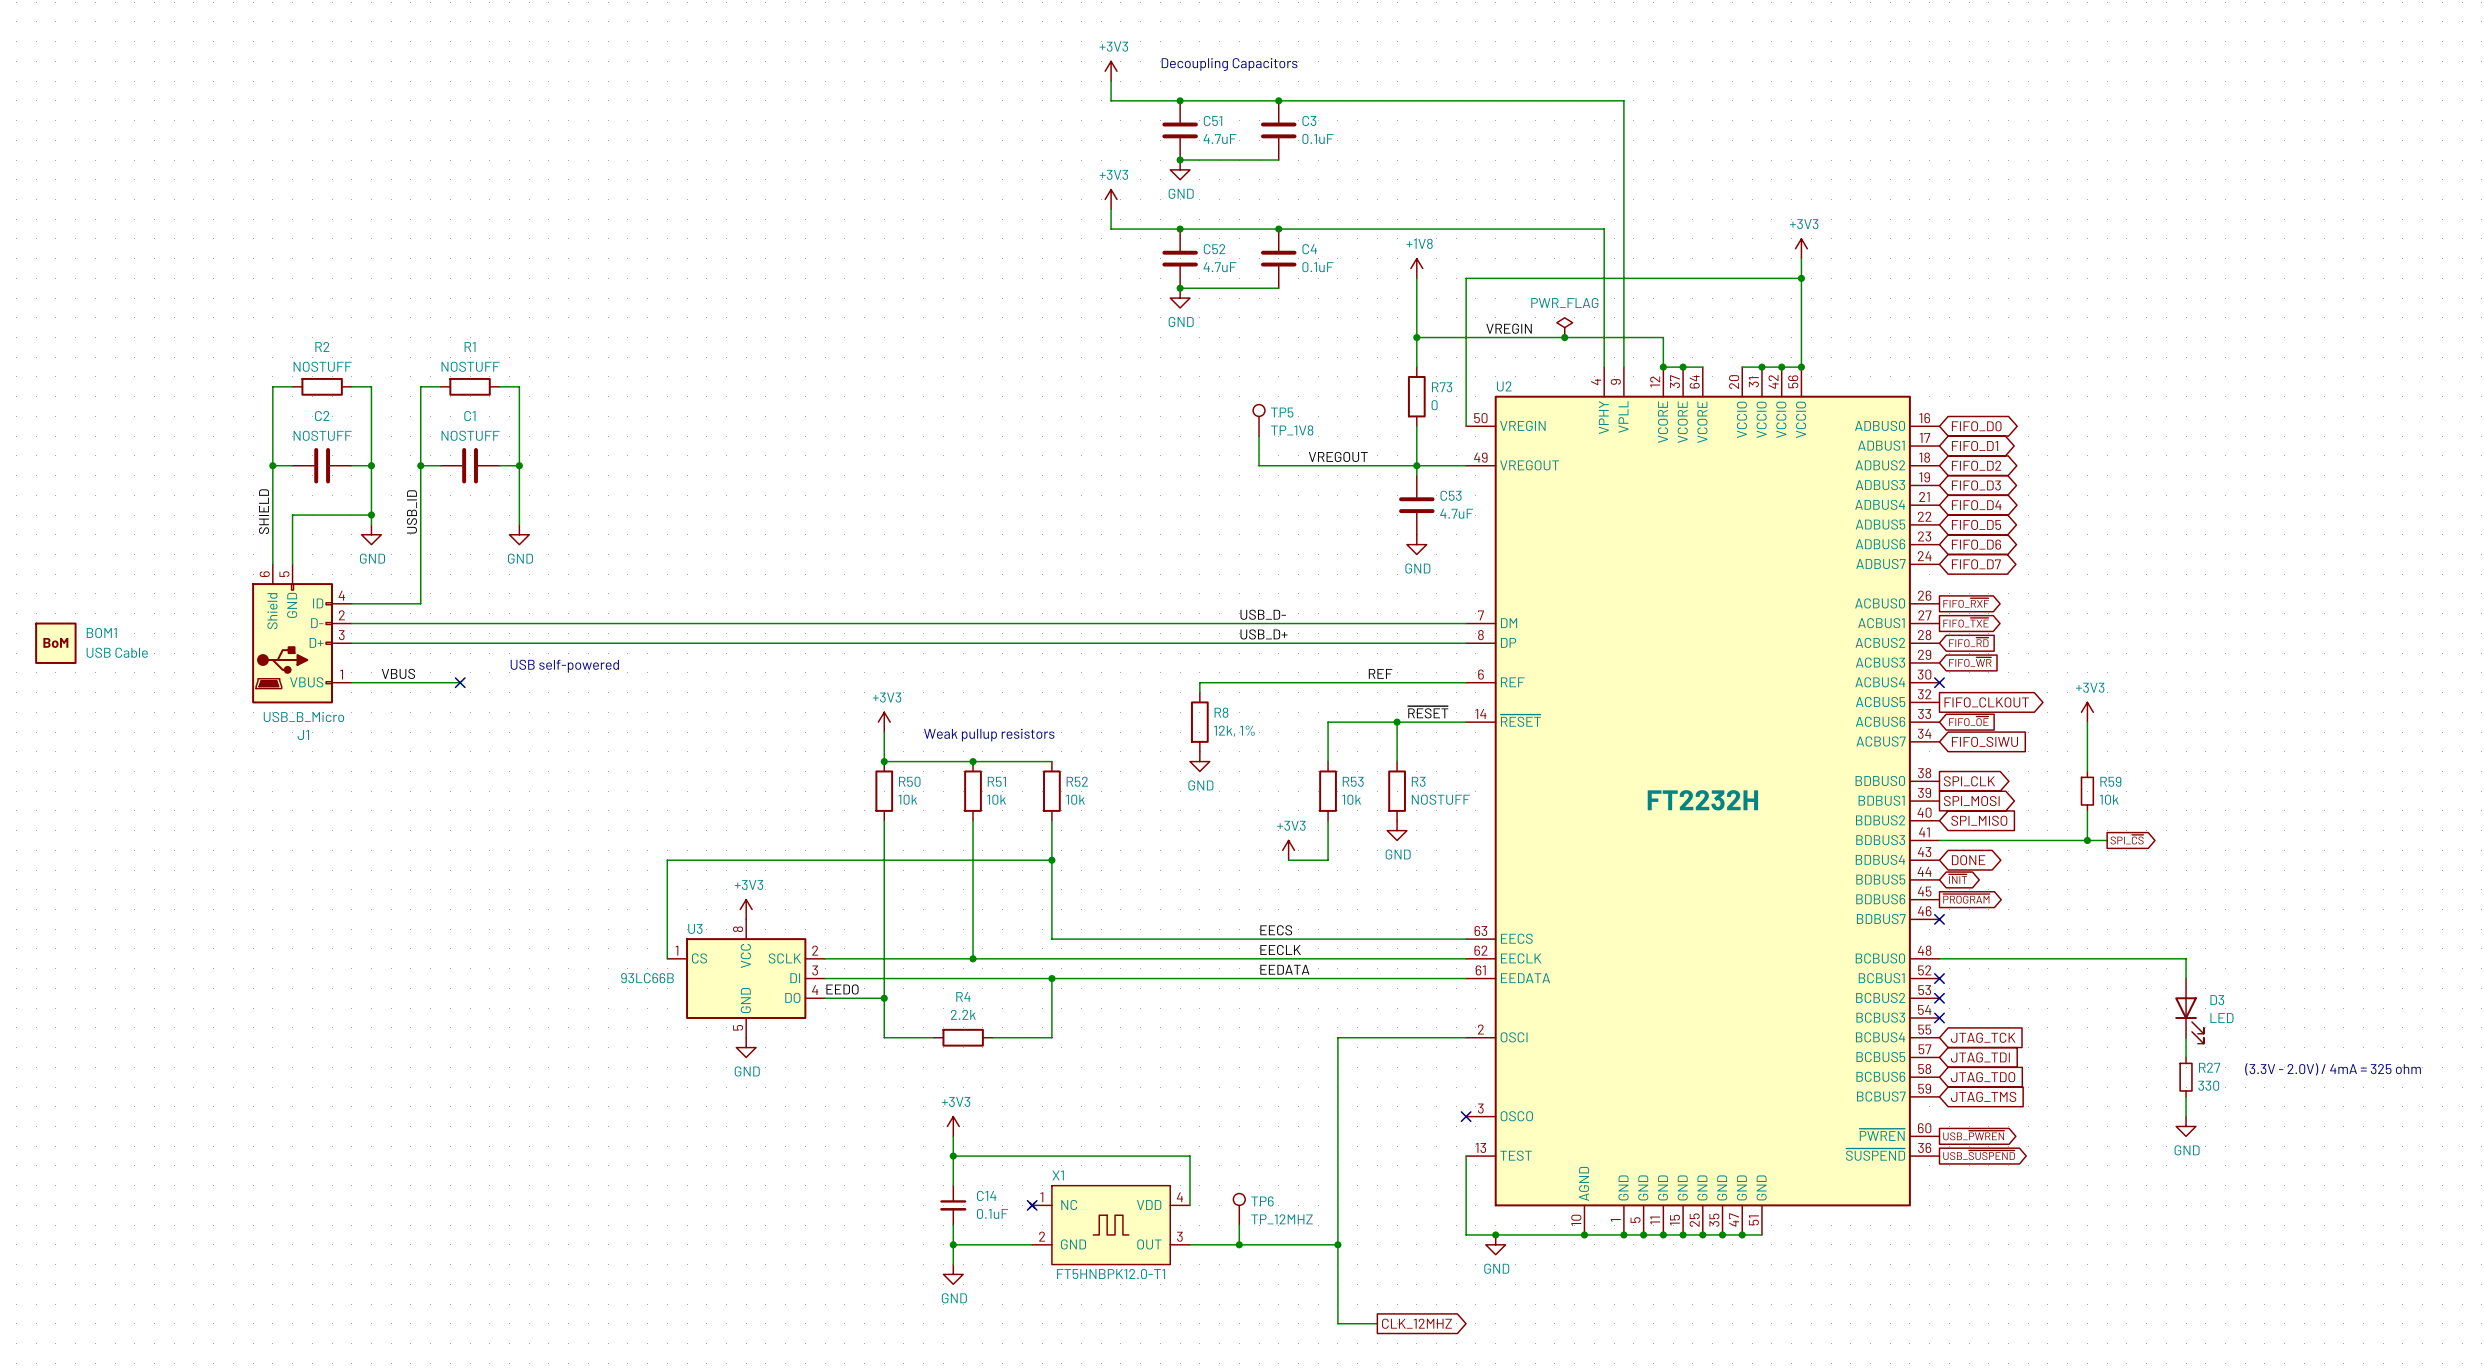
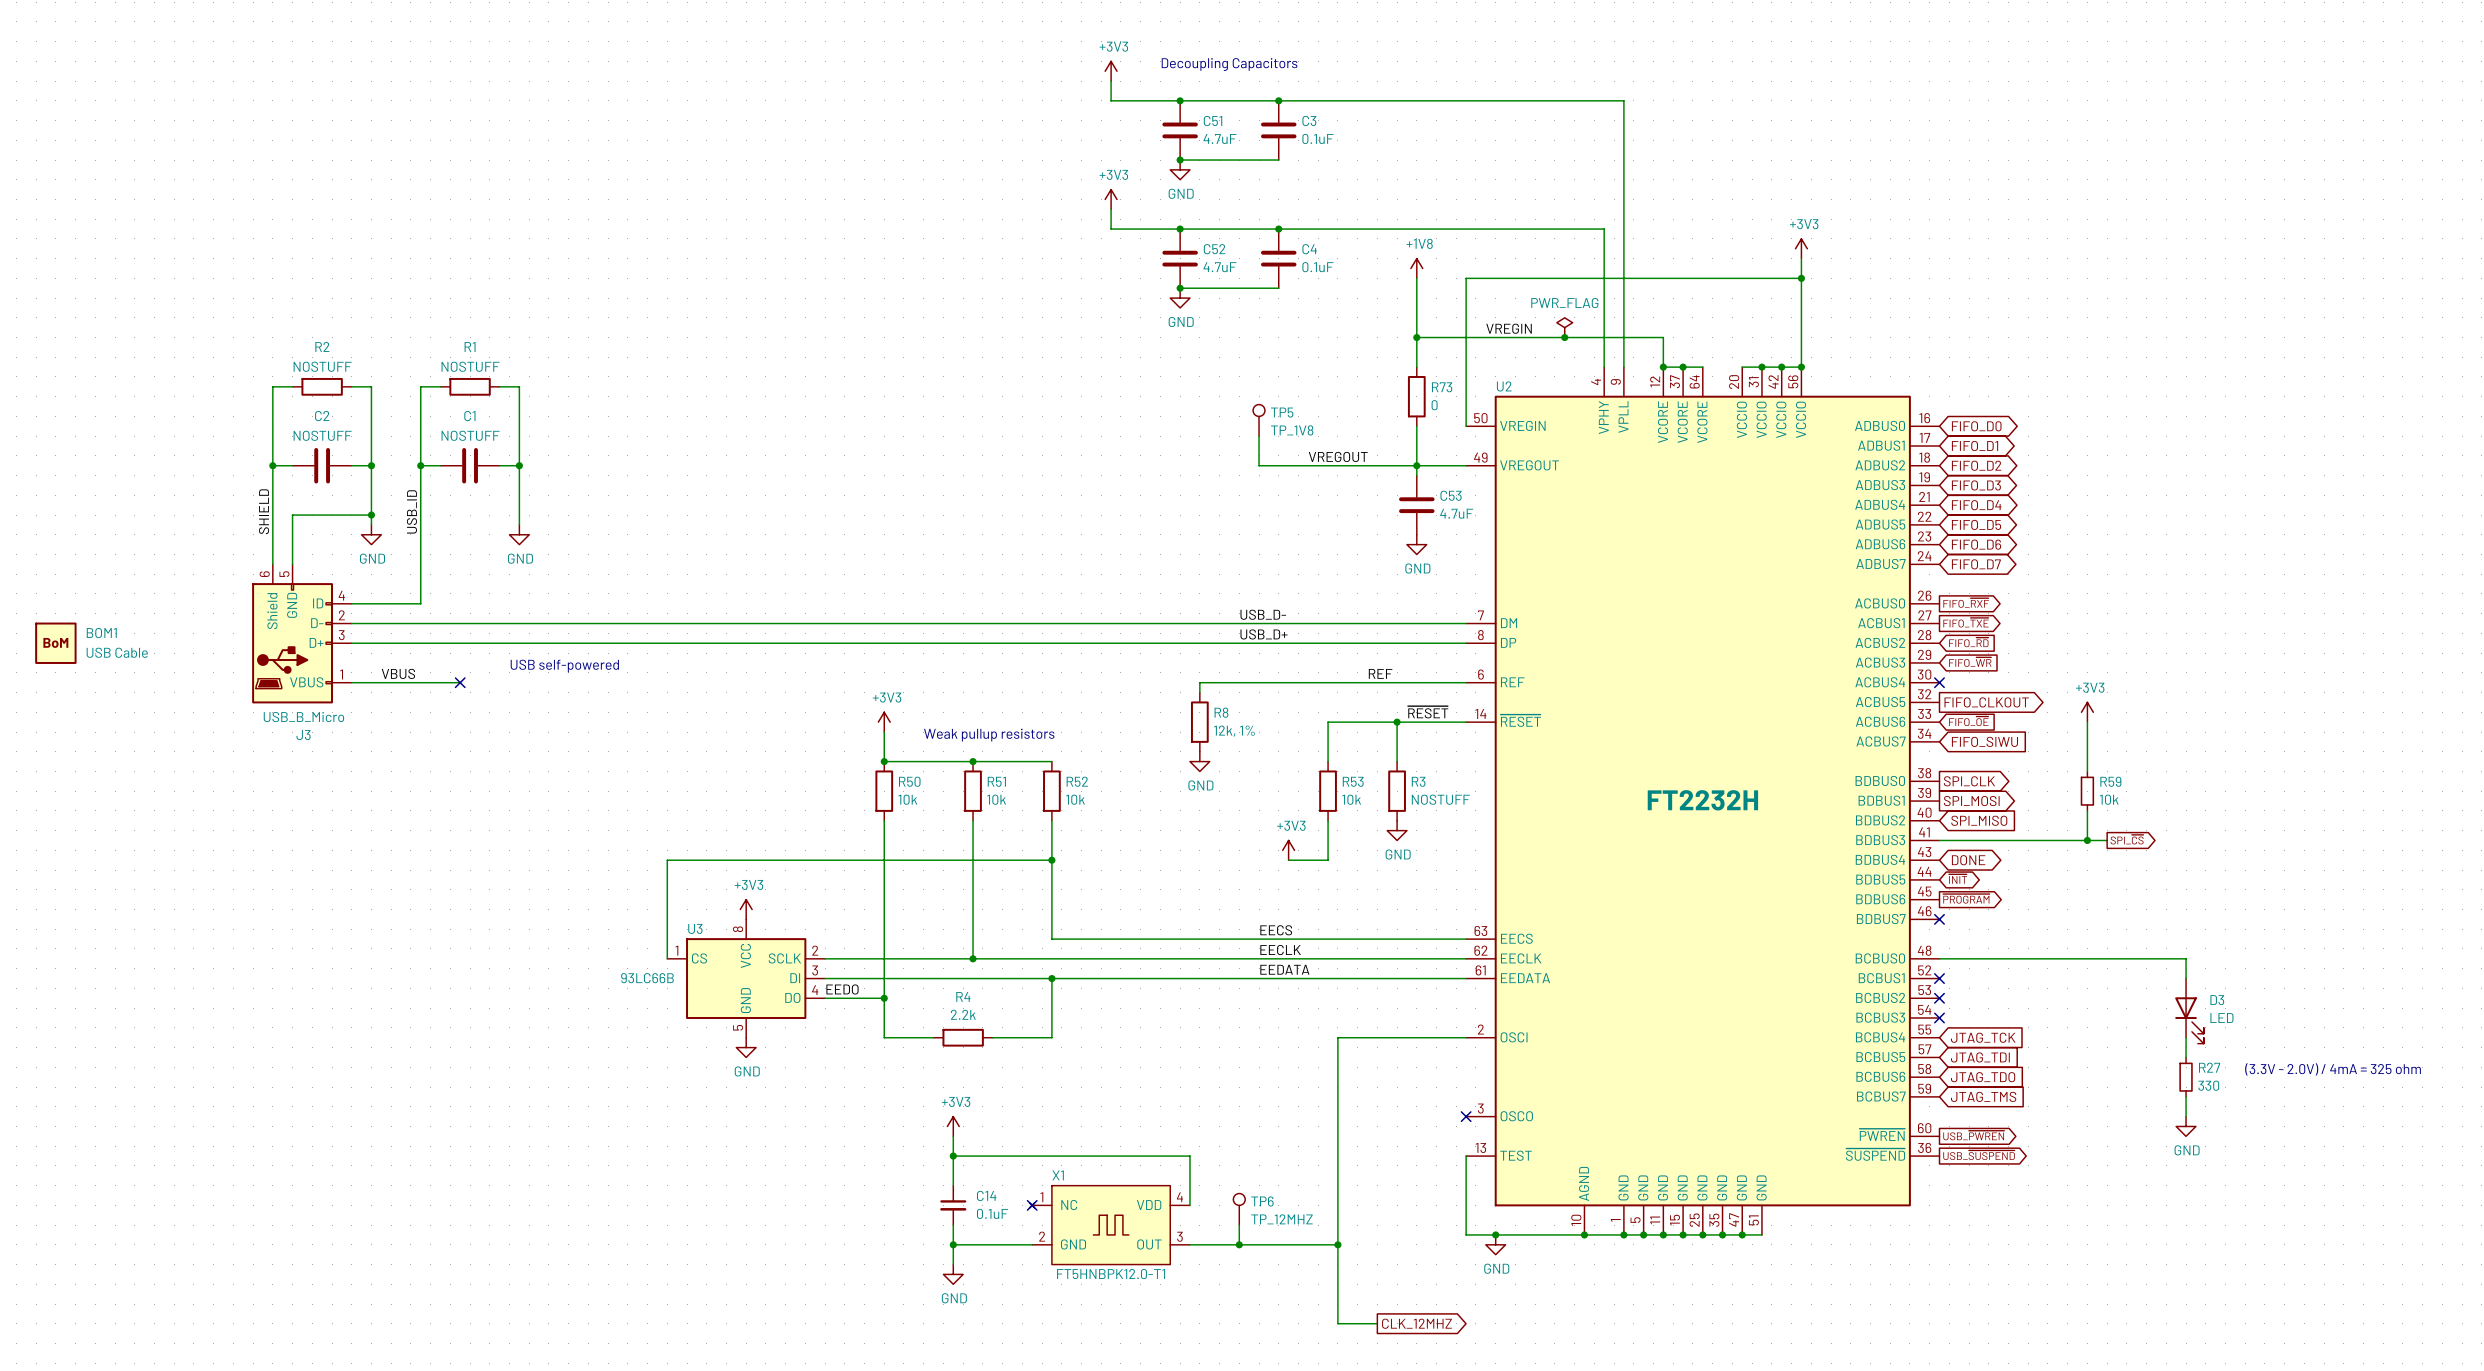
J1 name: J1 (303, 735) -> J3 (303, 735)

